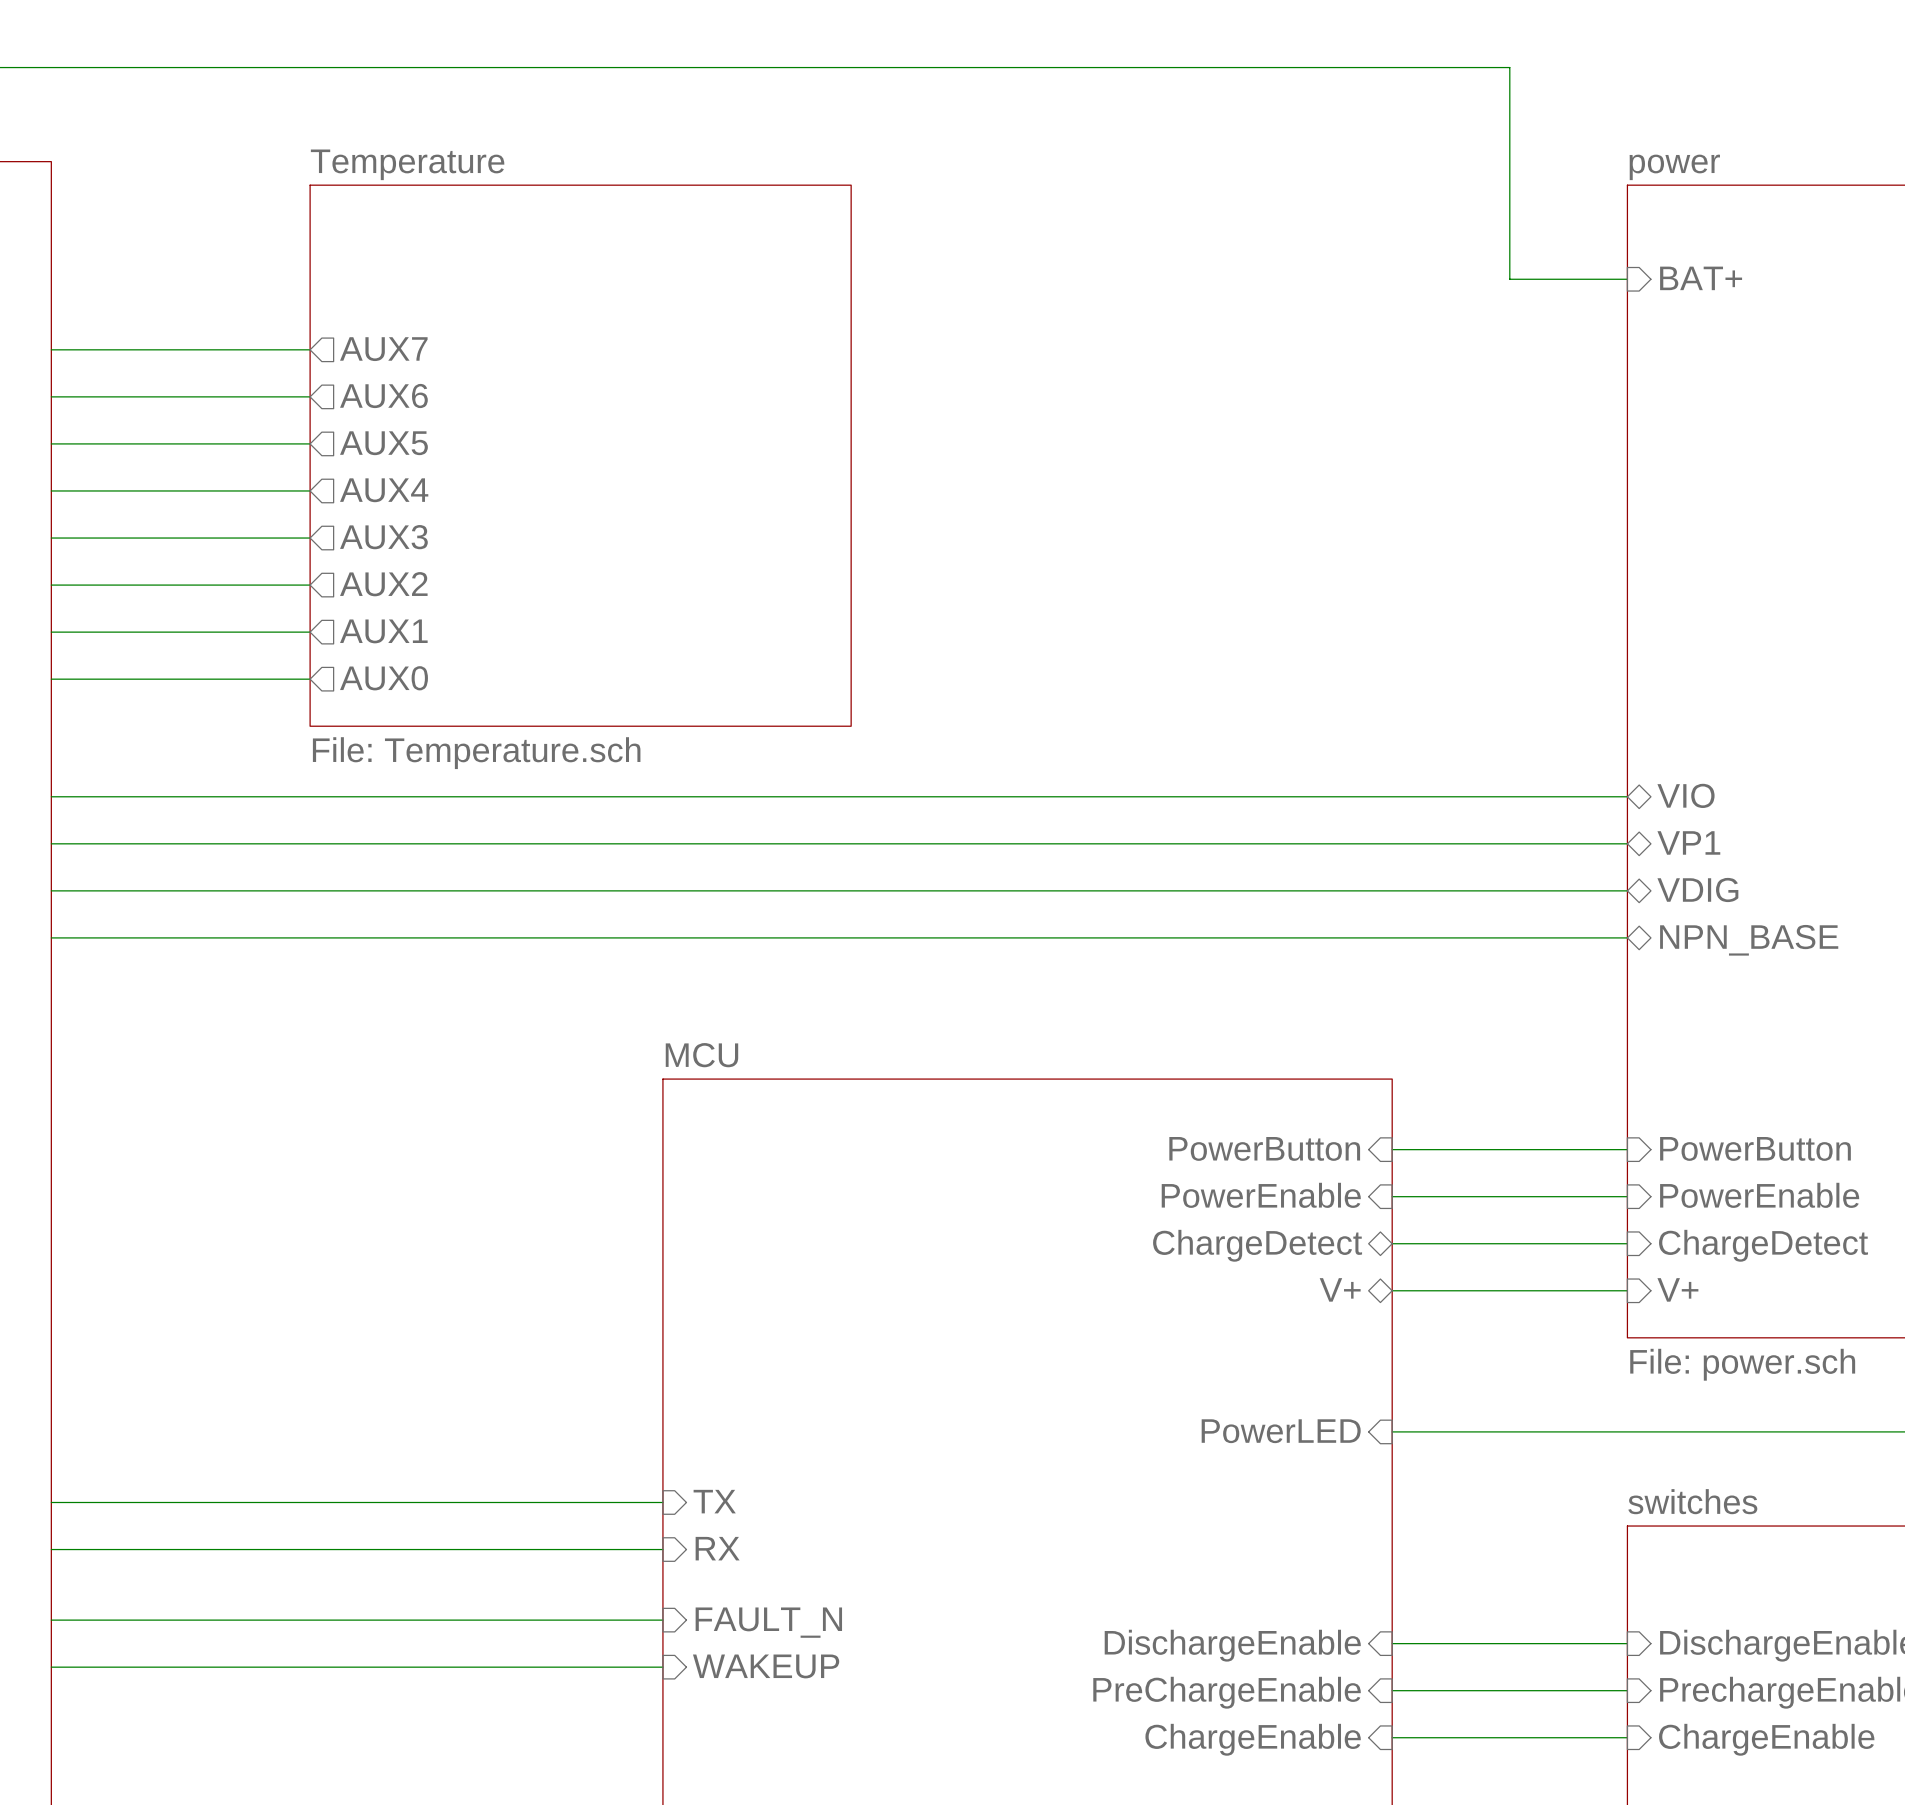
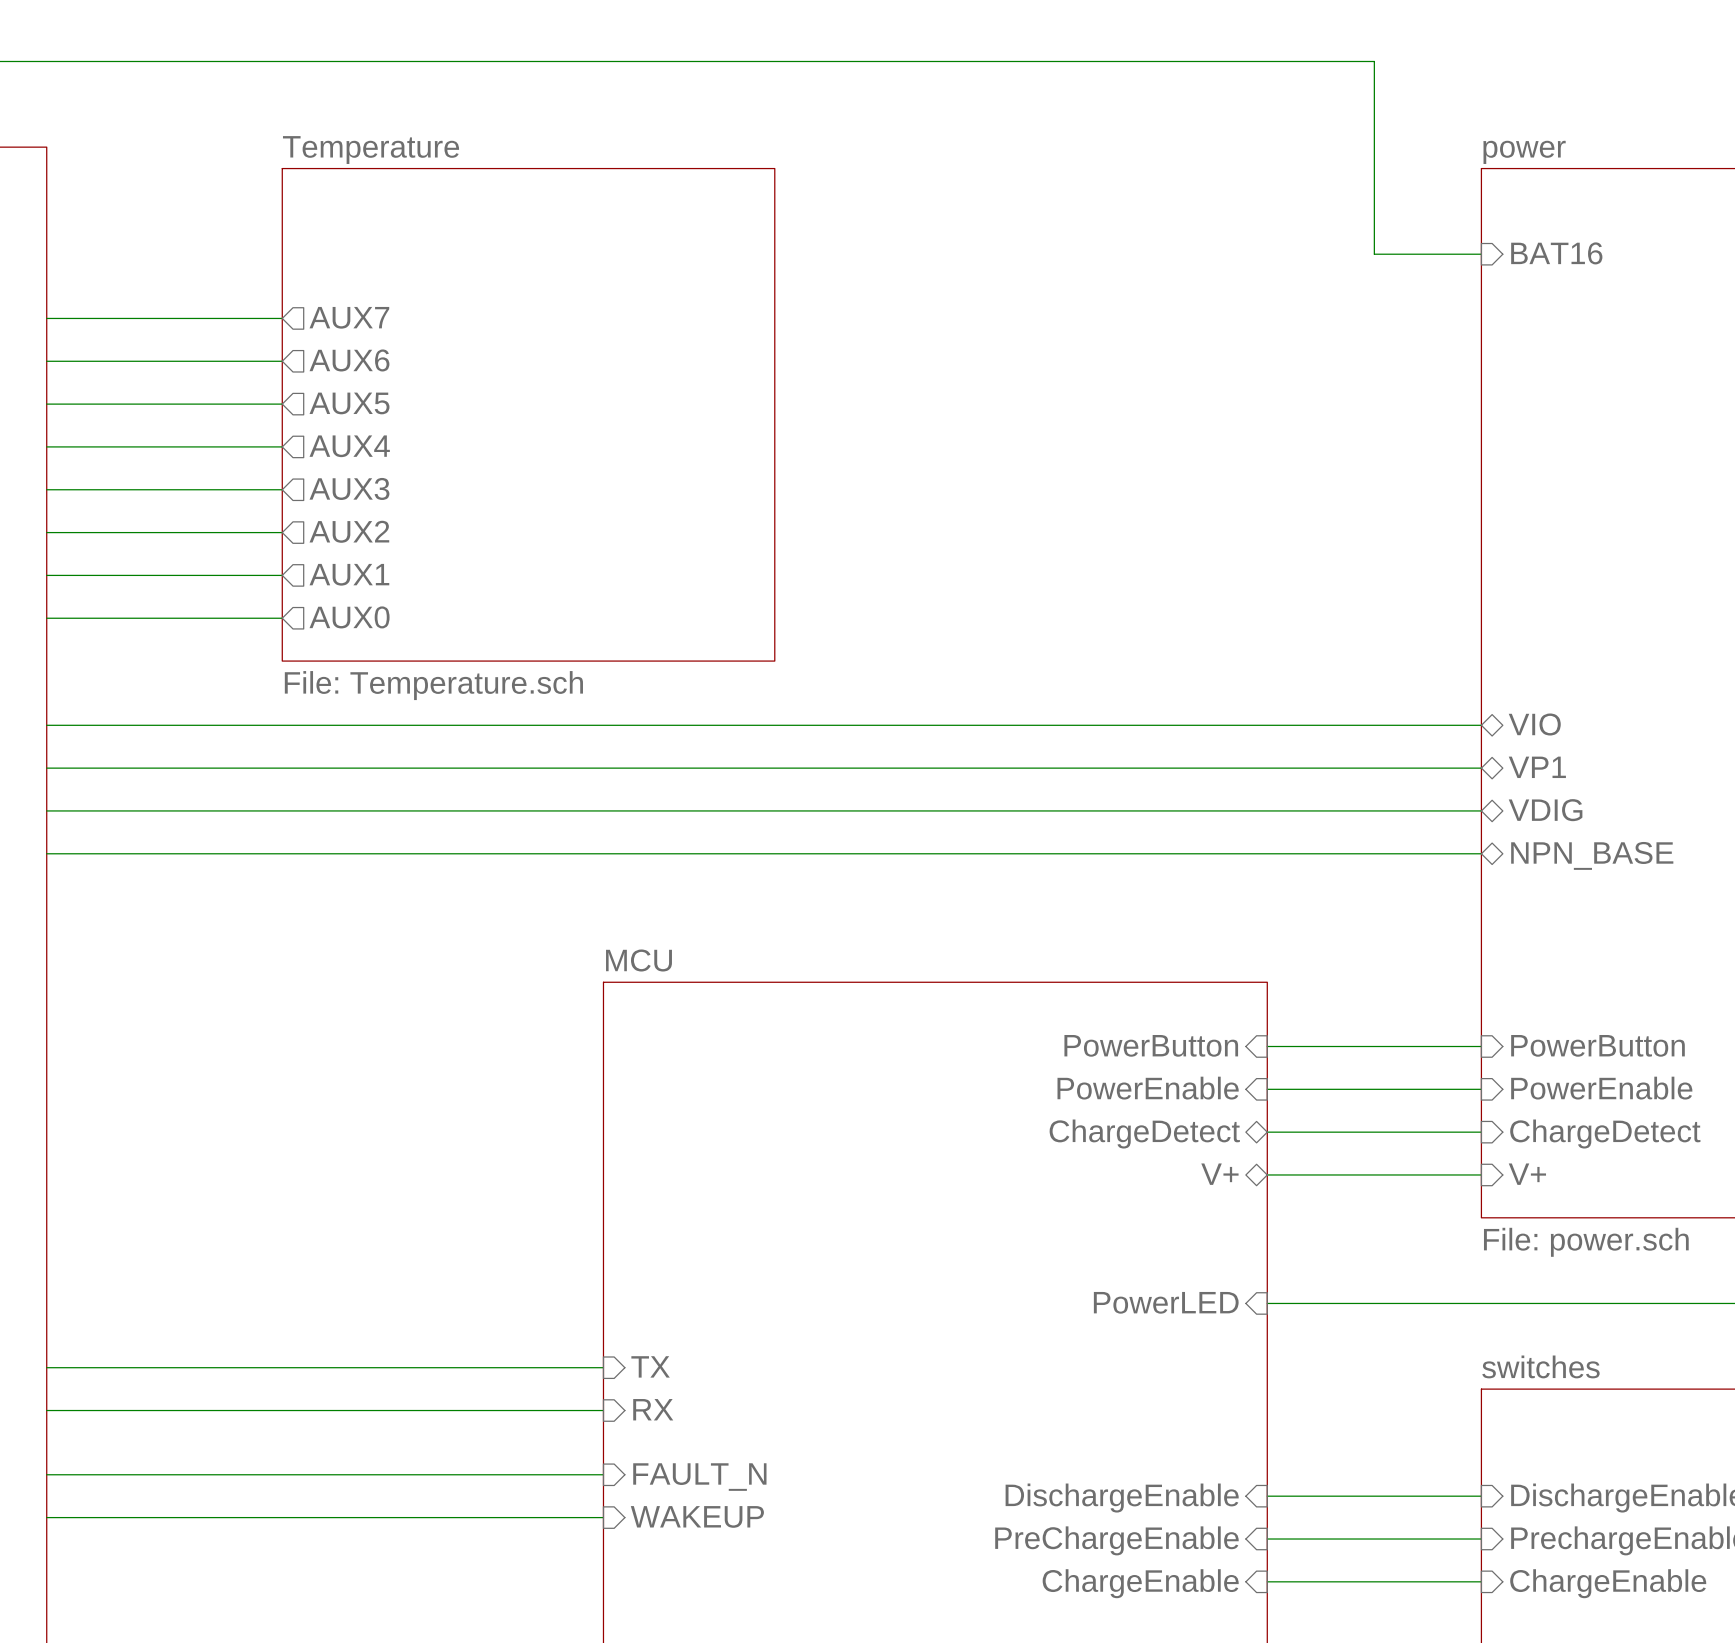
sheet pin: BAT+ (1701, 278) -> BAT16 (1556, 253)

